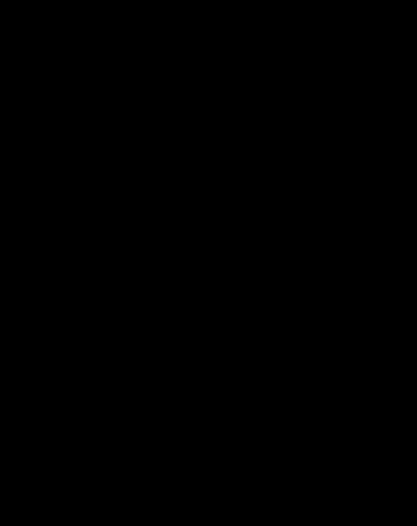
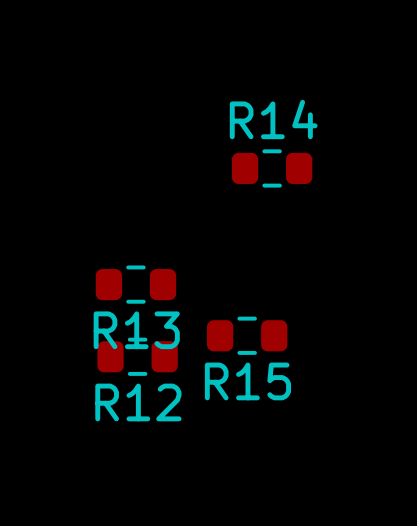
R14: none -> (272, 168)
R13: none -> (135, 284)
R15: none -> (247, 335)
R12: none -> (137, 356)

